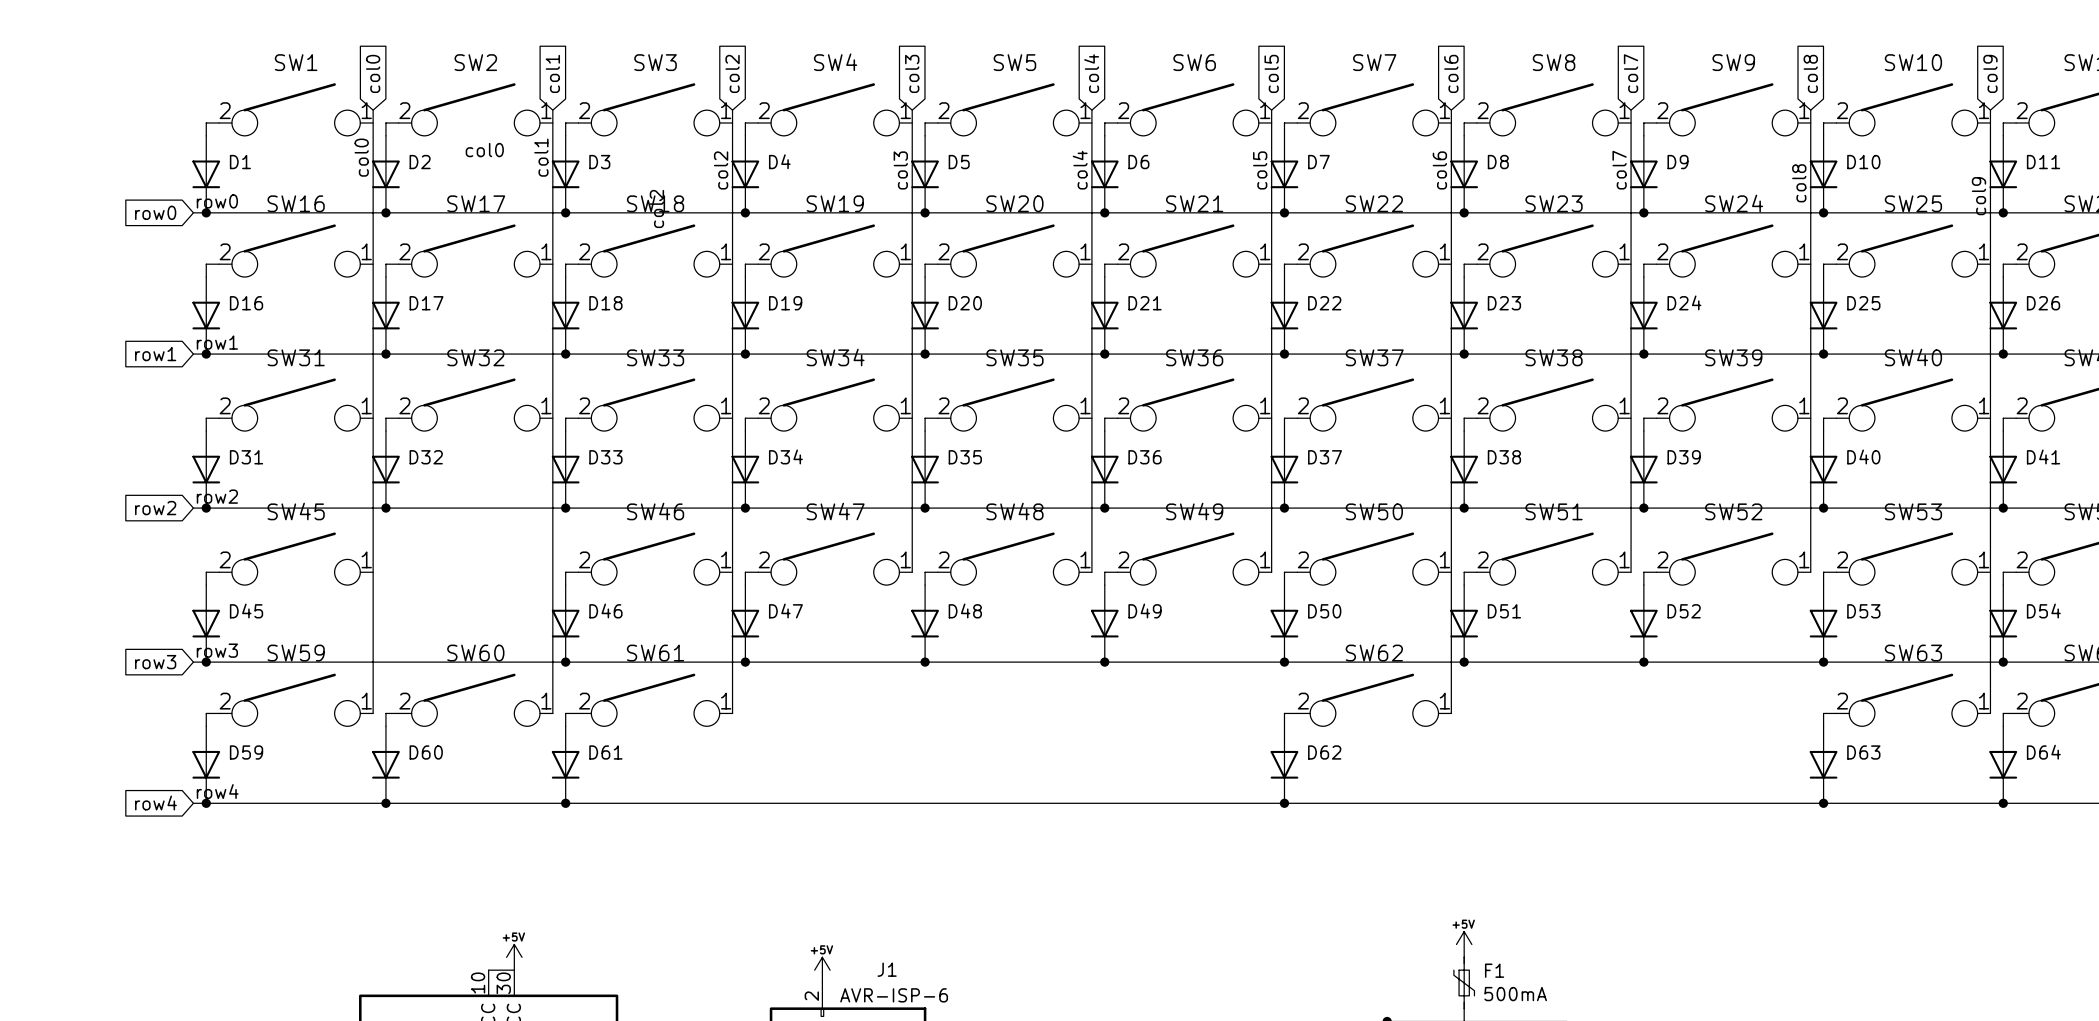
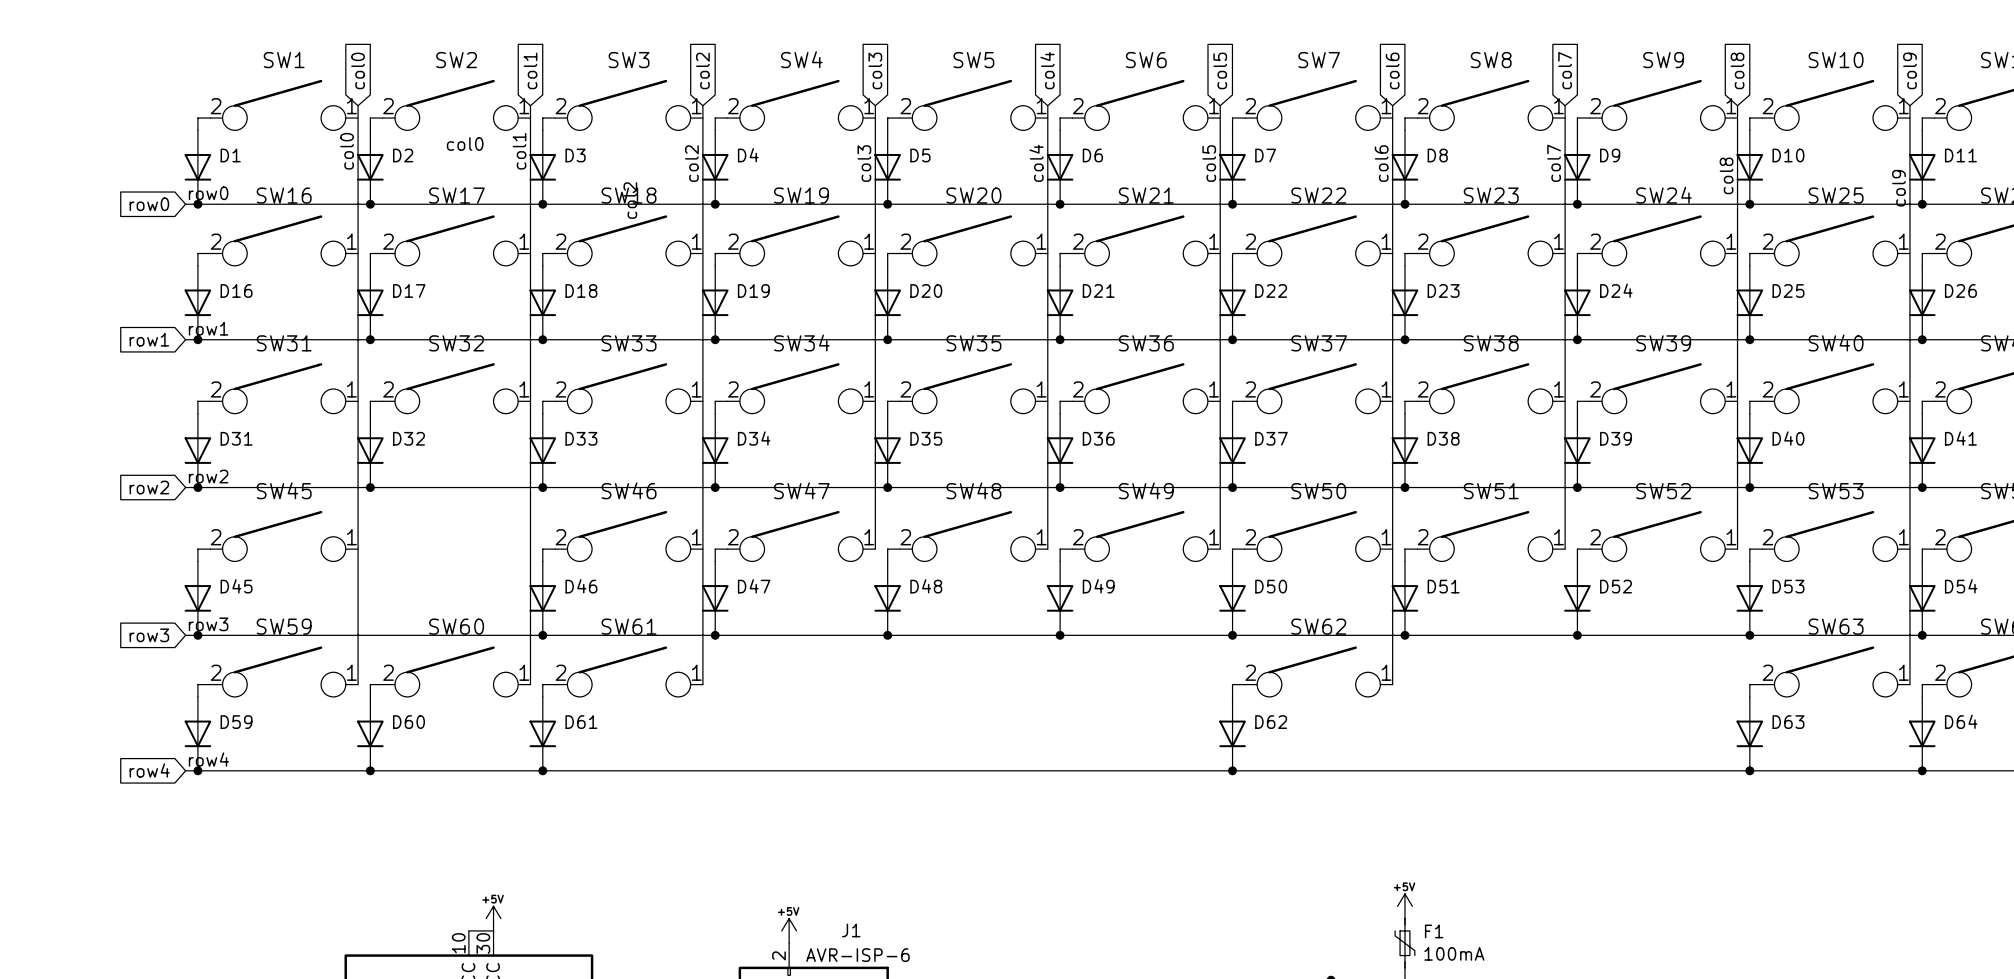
F1 value: 500mA (1515, 994) -> 100mA (1454, 953)

